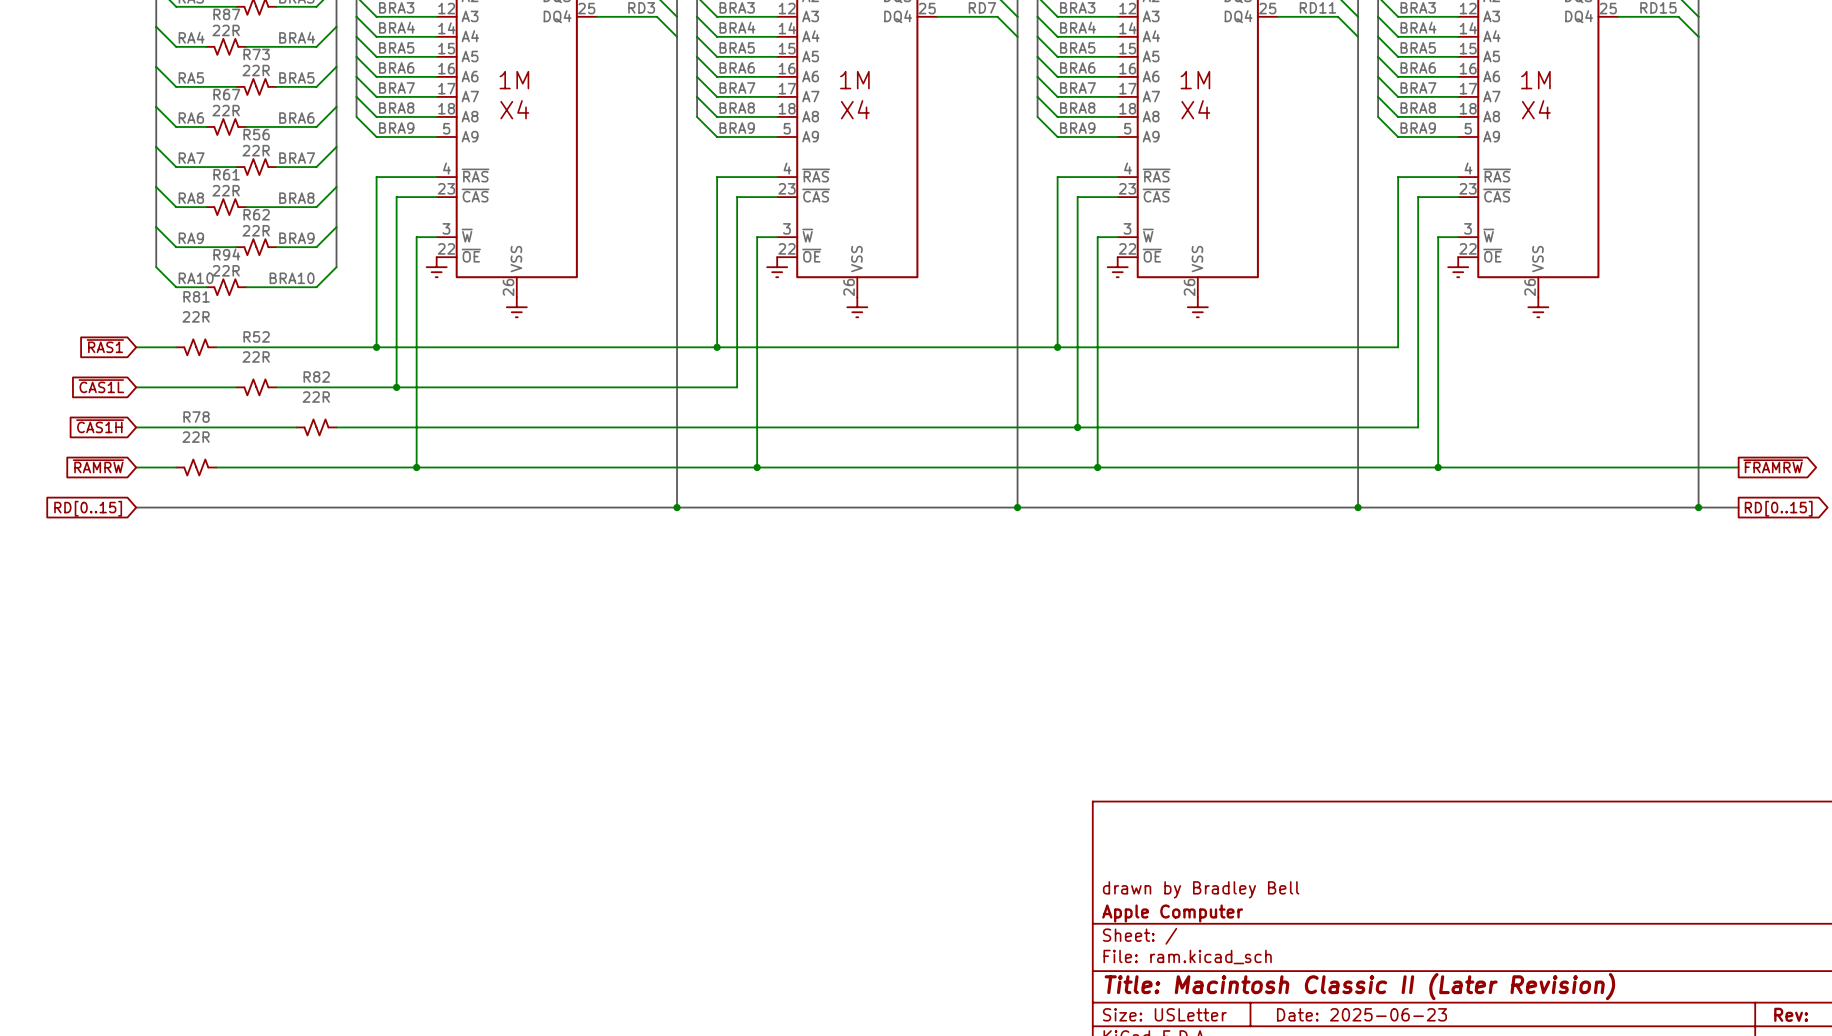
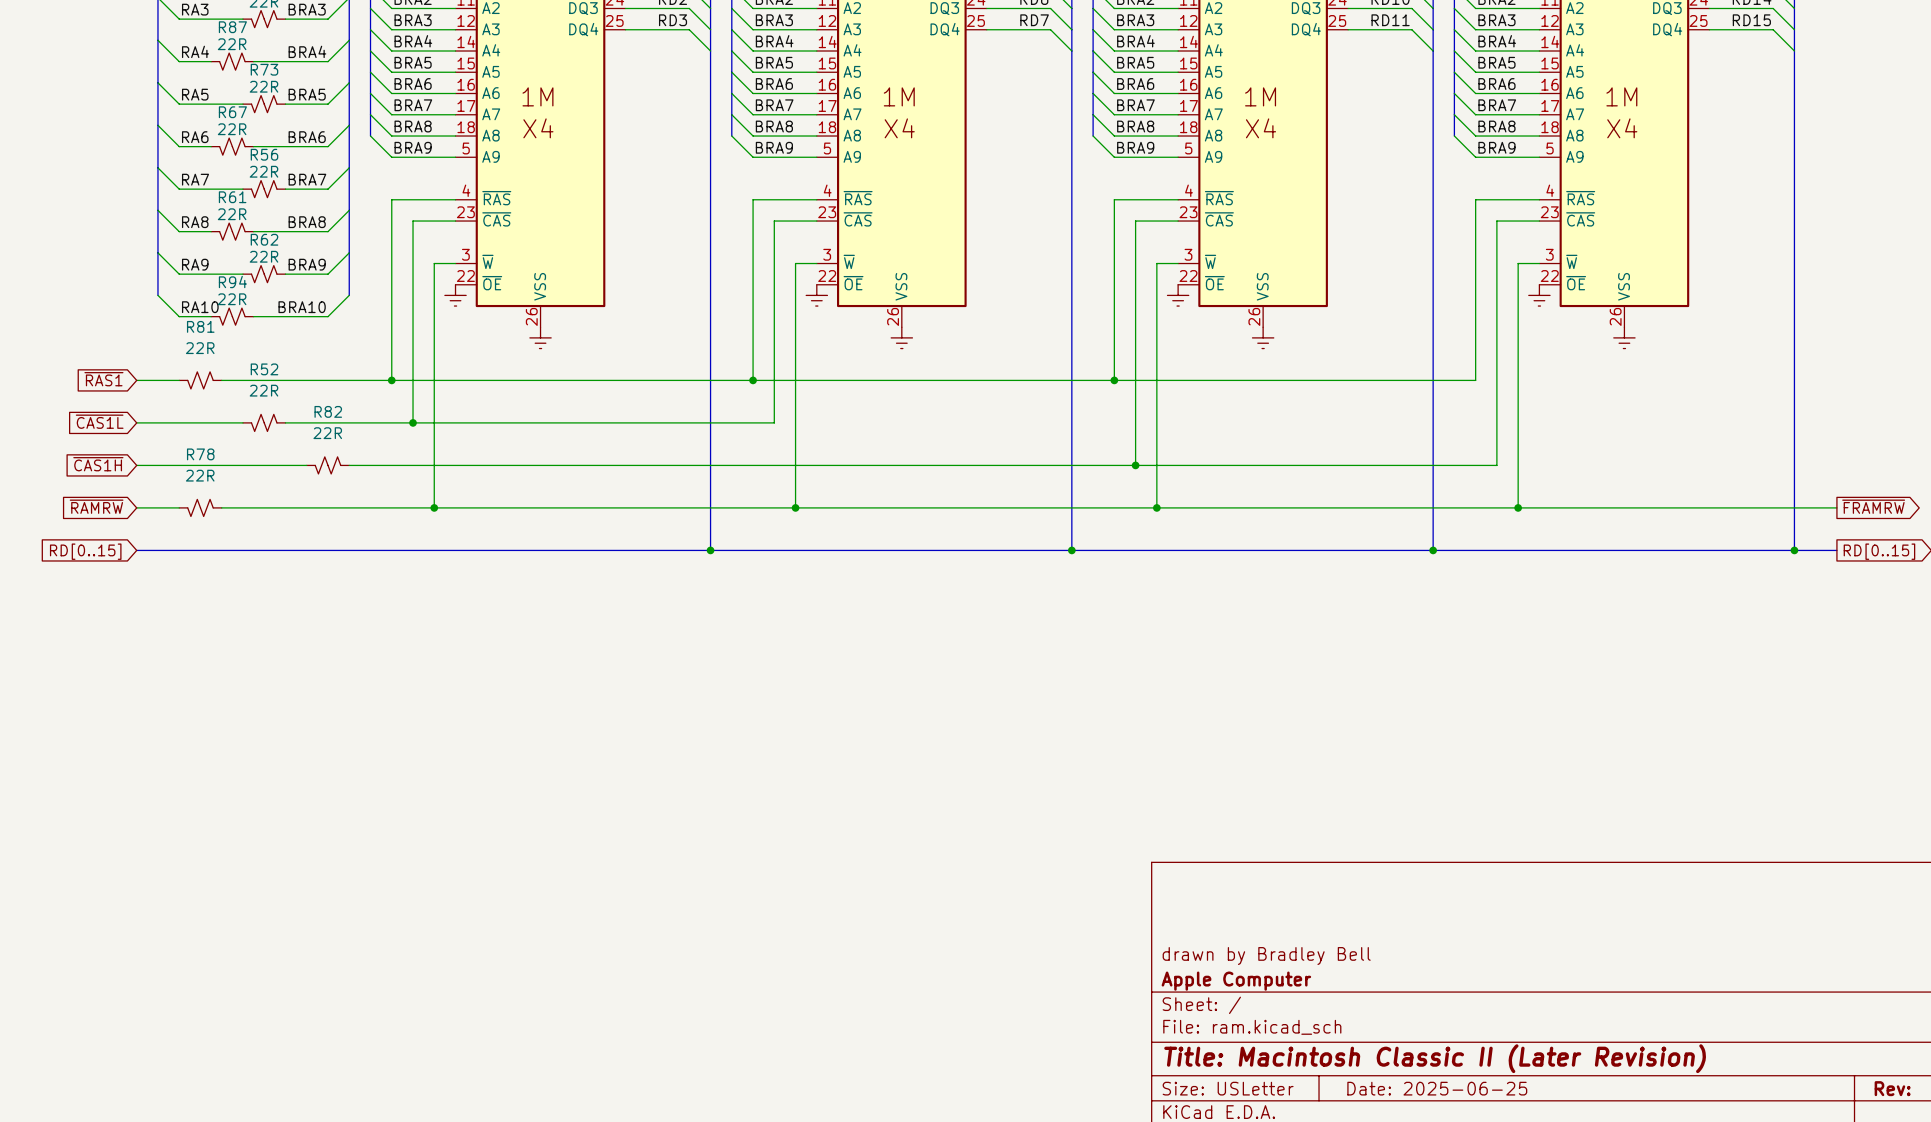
title block: Date: 2025-06-23 (1361, 1014) -> Date: 2025-06-25 (1437, 1088)

